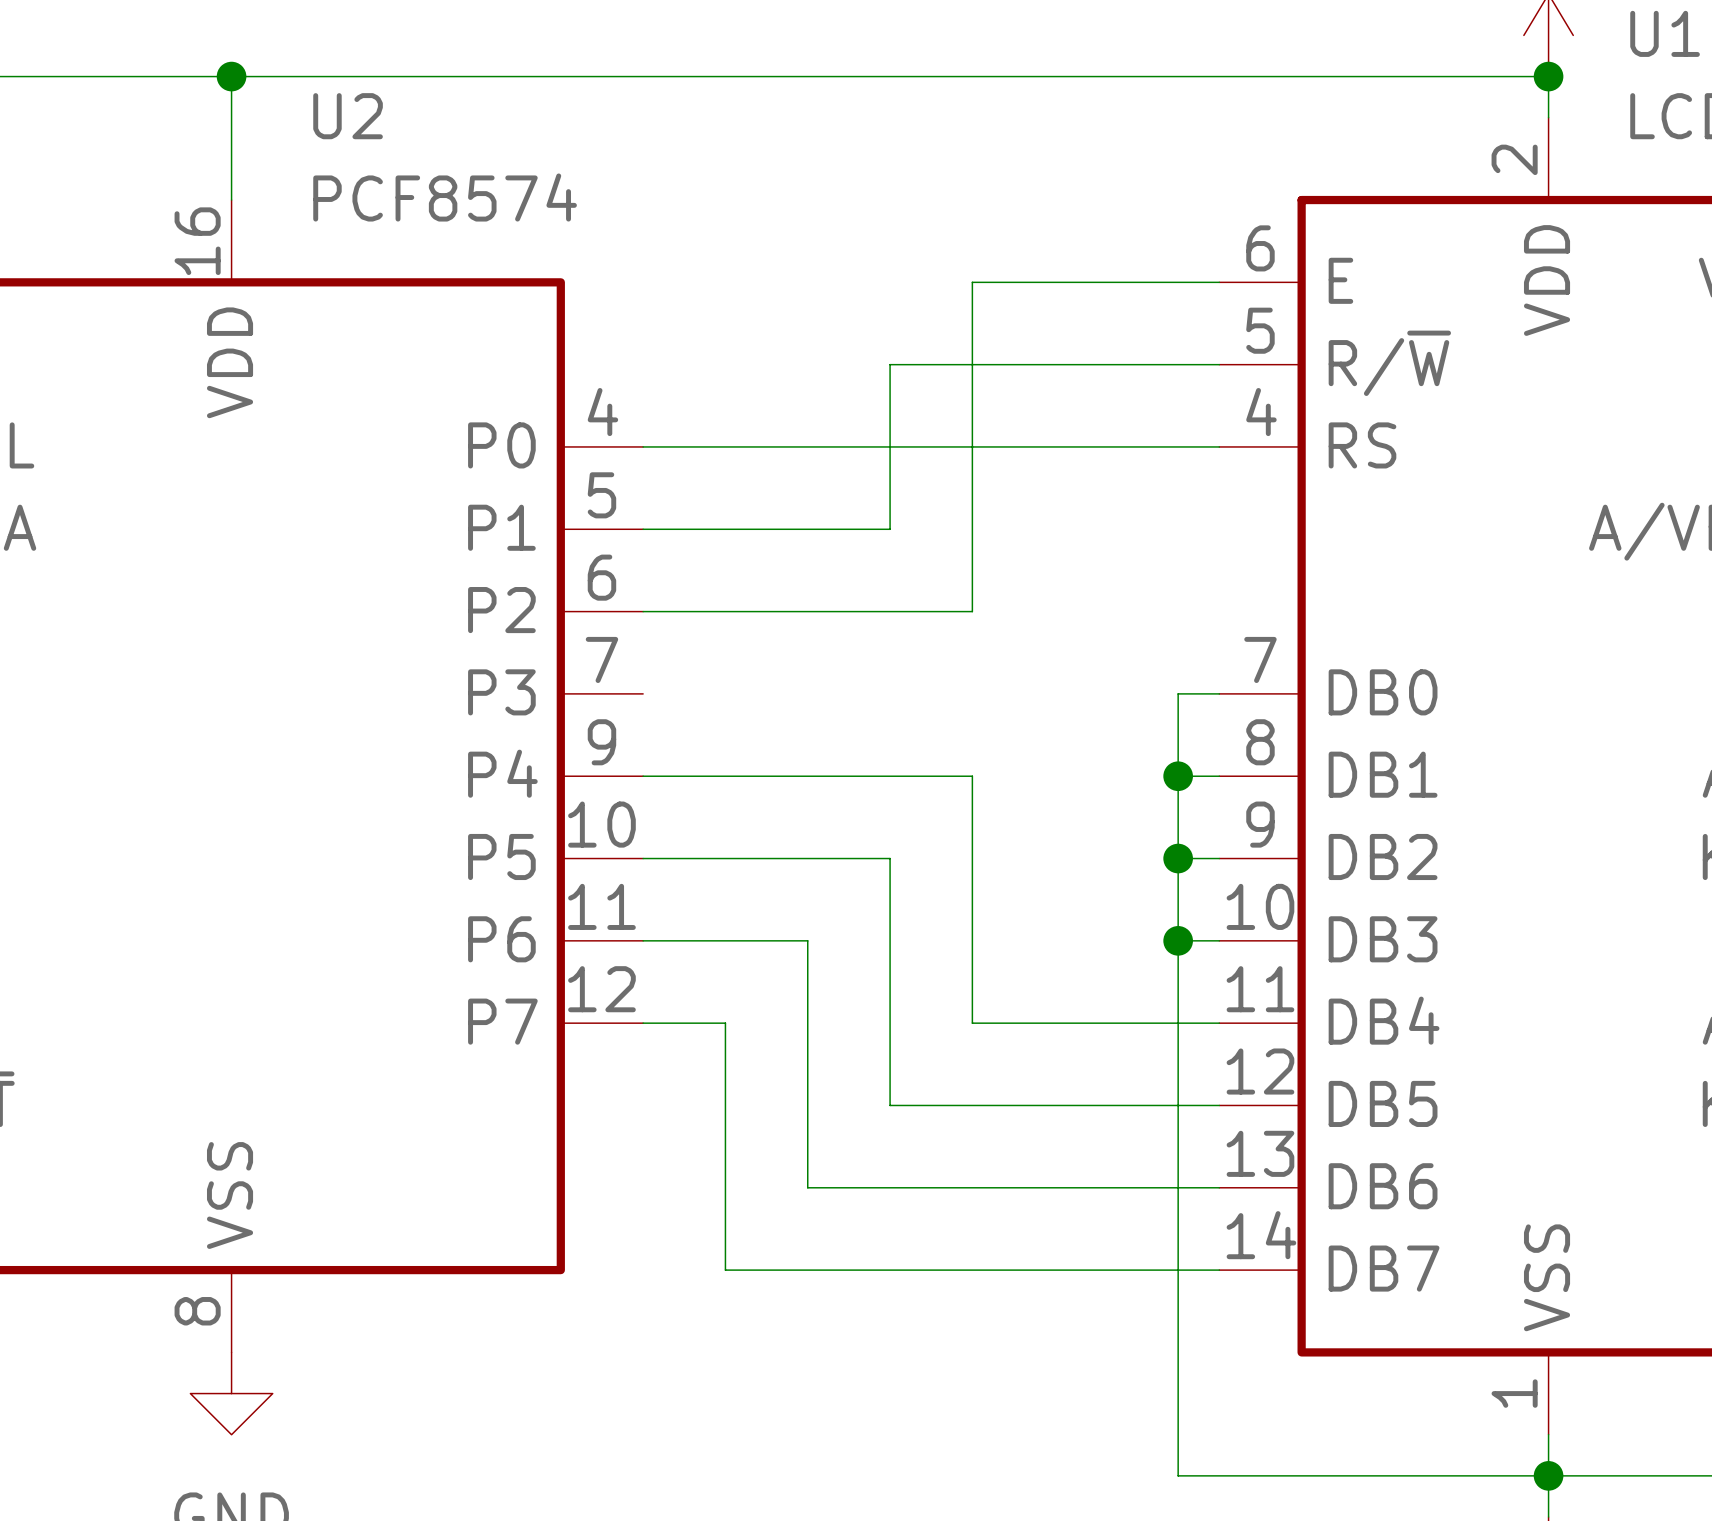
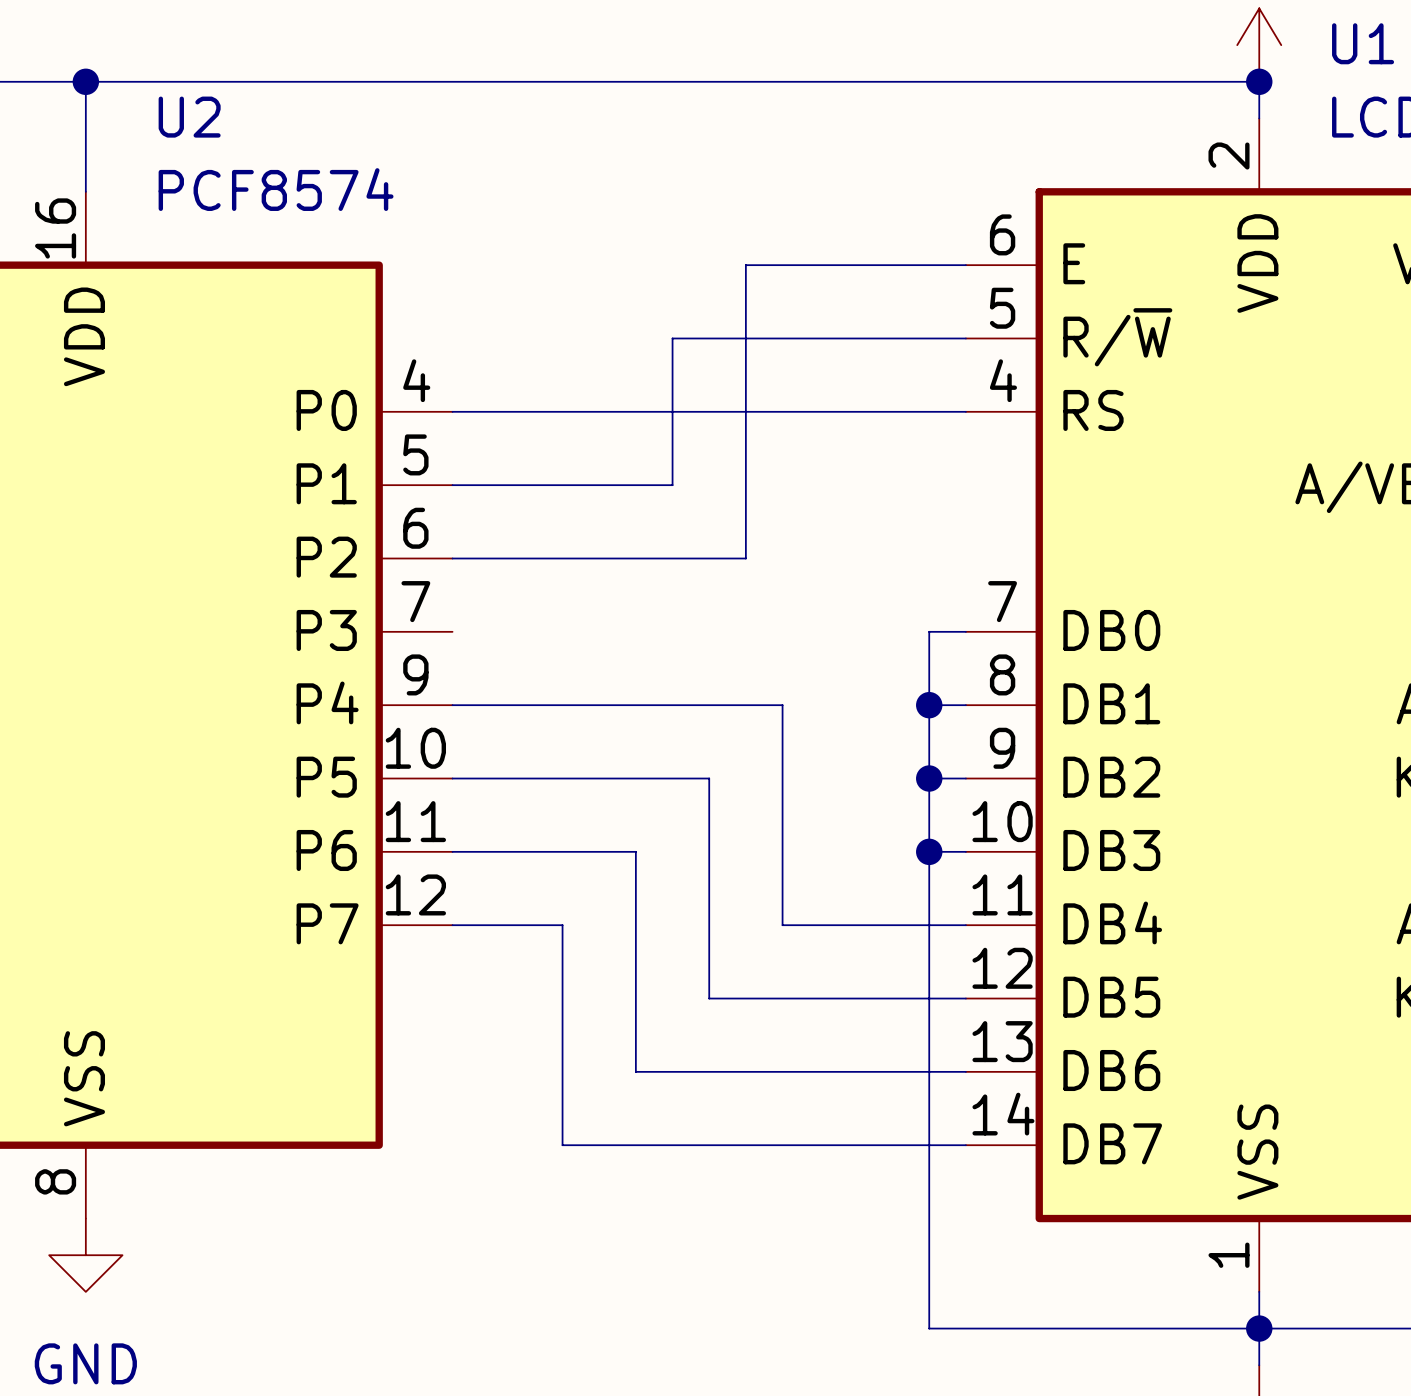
wire: (972, 776) (972, 1023) (1013, 1023) -> (745, 705) (782, 705) (782, 925)
wire: (890, 858) (890, 1105) (931, 1105) -> (672, 778) (709, 778) (709, 998)
wire: (807, 940) (807, 1187) (848, 1187) -> (599, 851) (635, 851) (635, 1071)
wire: (725, 1023) (725, 1270) (766, 1270) -> (525, 925) (562, 925) (562, 1145)

